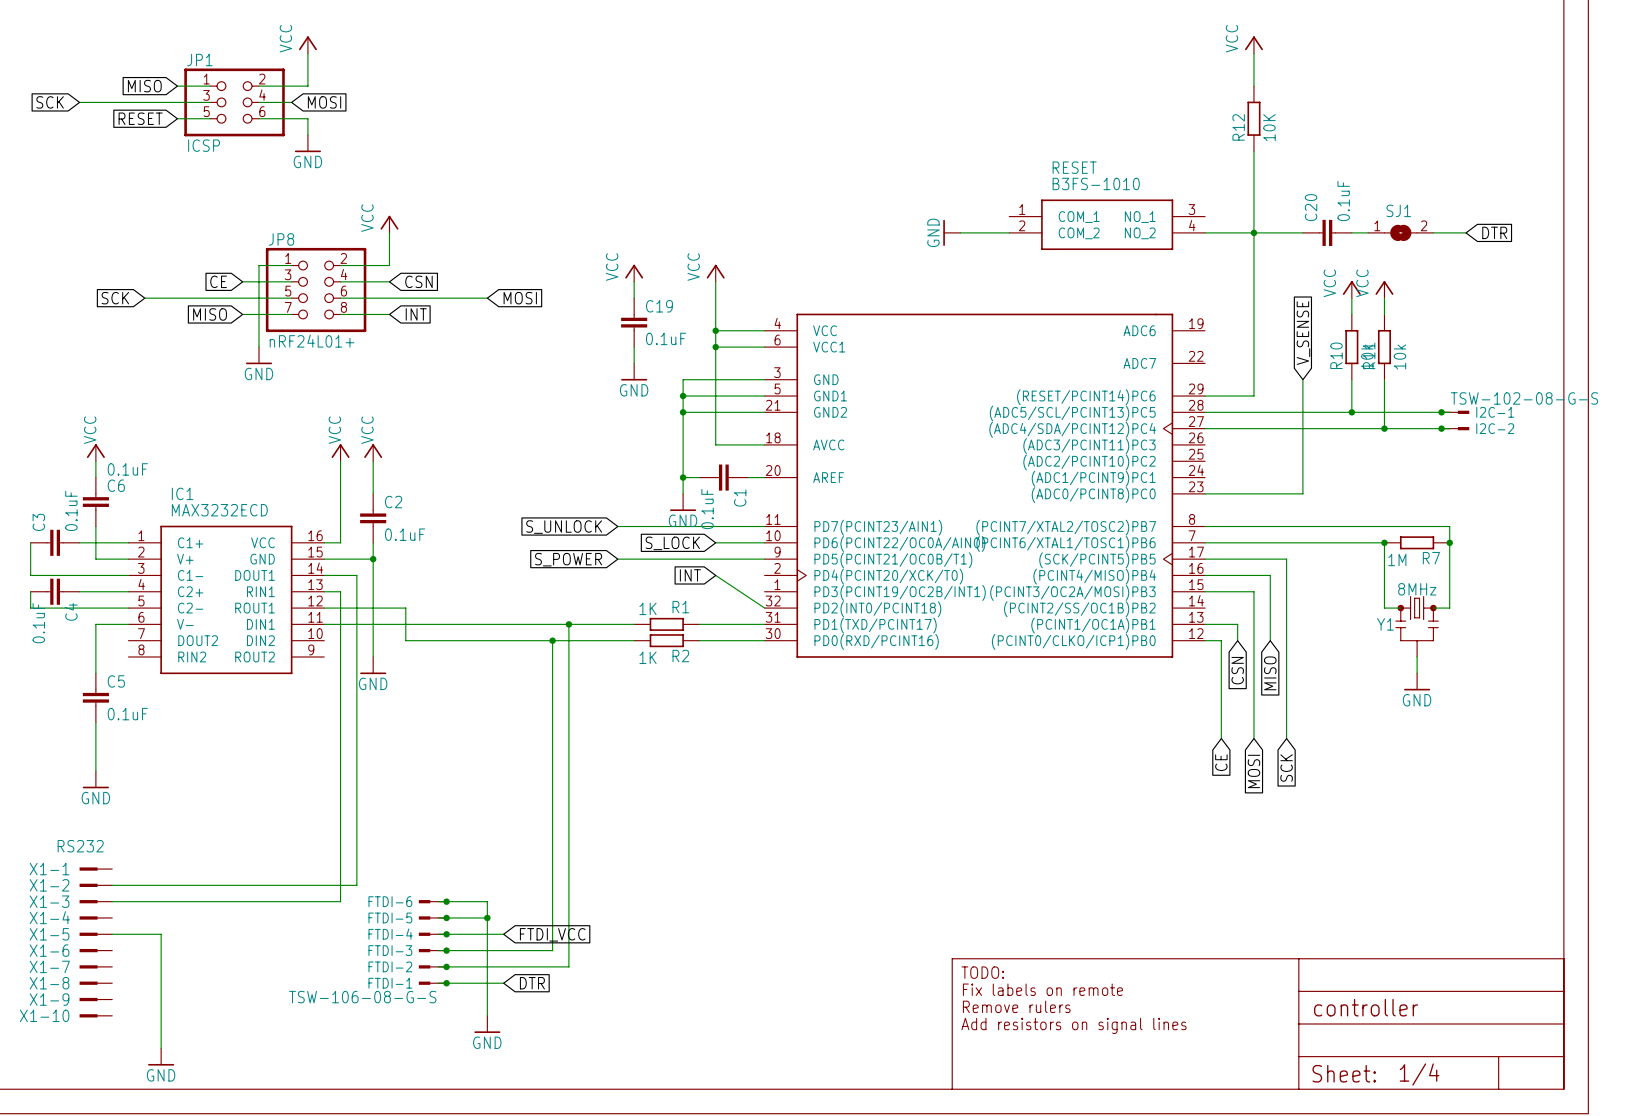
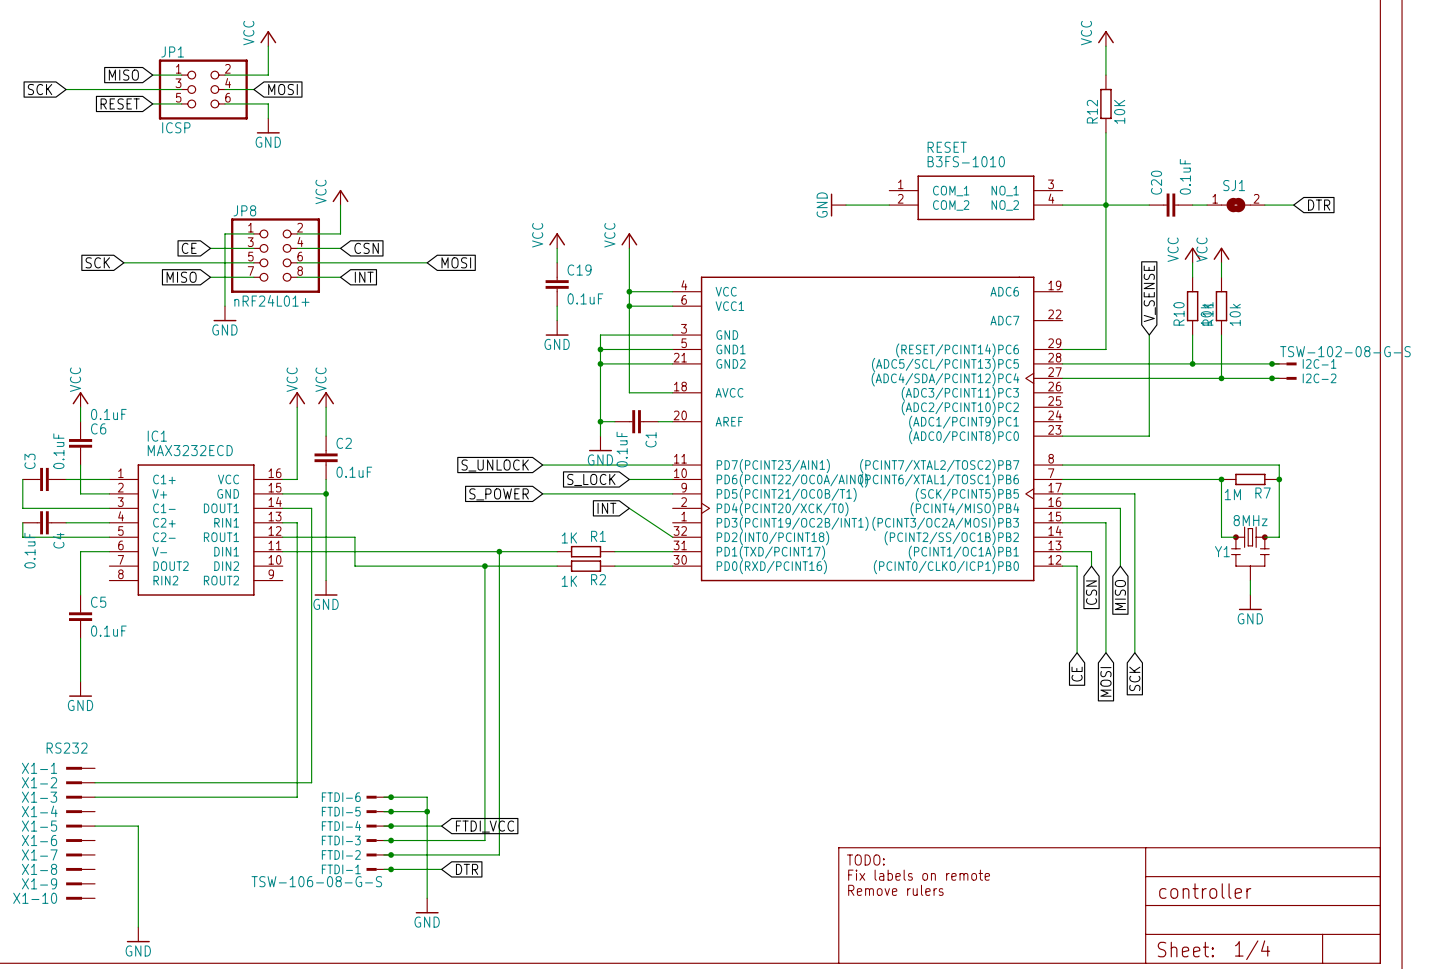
text: Add resistors on signal lines (1074, 1025) -> none

